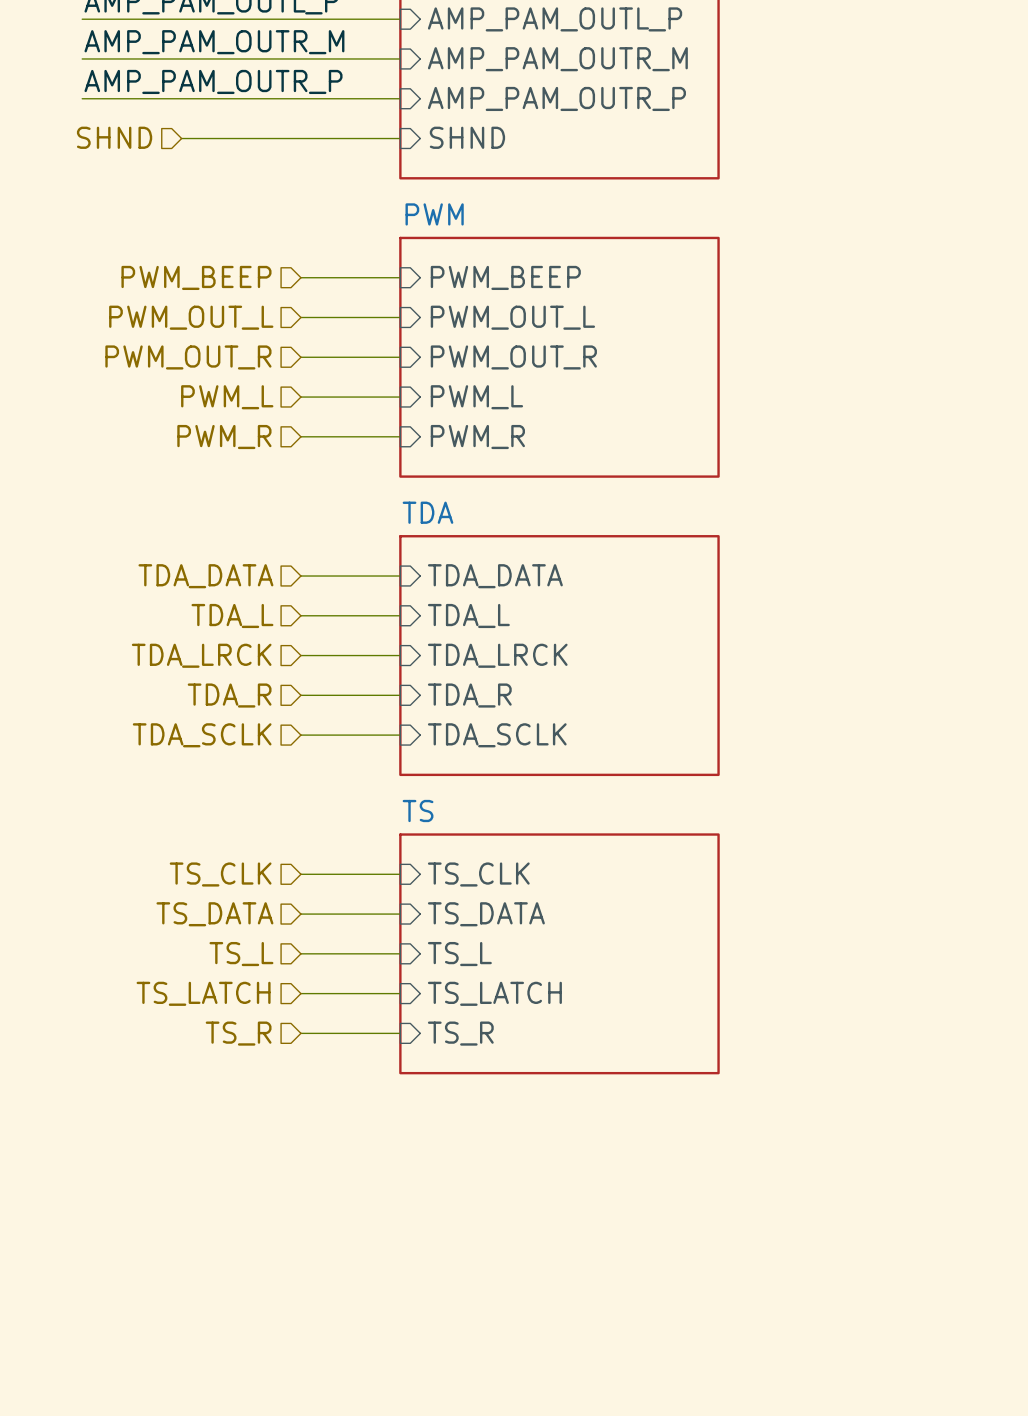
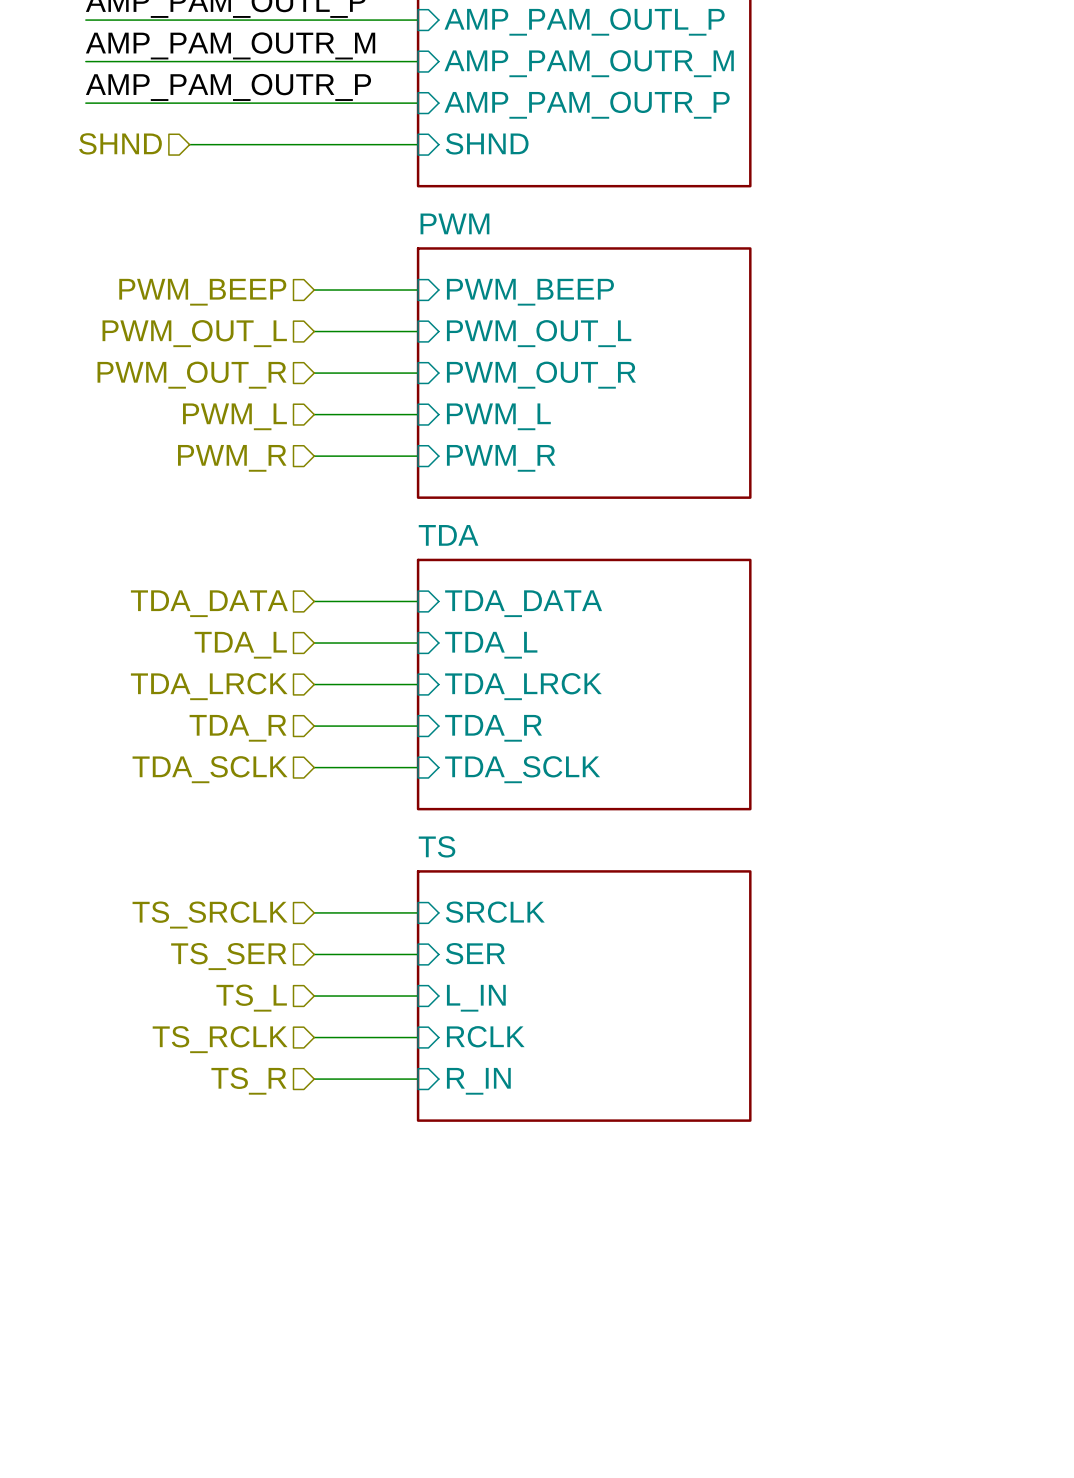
hierarchical label: TS_CLK (220, 874) -> TS_SRCLK (210, 915)
sheet pin: TS_CLK (478, 874) -> SRCLK (495, 912)
hierarchical label: TS_DATA (214, 914) -> TS_SER (228, 956)
sheet pin: TS_DATA (486, 914) -> SER (475, 953)
sheet pin: TS_L (459, 954) -> L_IN (476, 998)
hierarchical label: TS_LATCH (203, 993) -> TS_RCLK (220, 1039)
sheet pin: TS_LATCH (494, 993) -> RCLK (485, 1036)
sheet pin: TS_R (460, 1033) -> R_IN (478, 1081)

